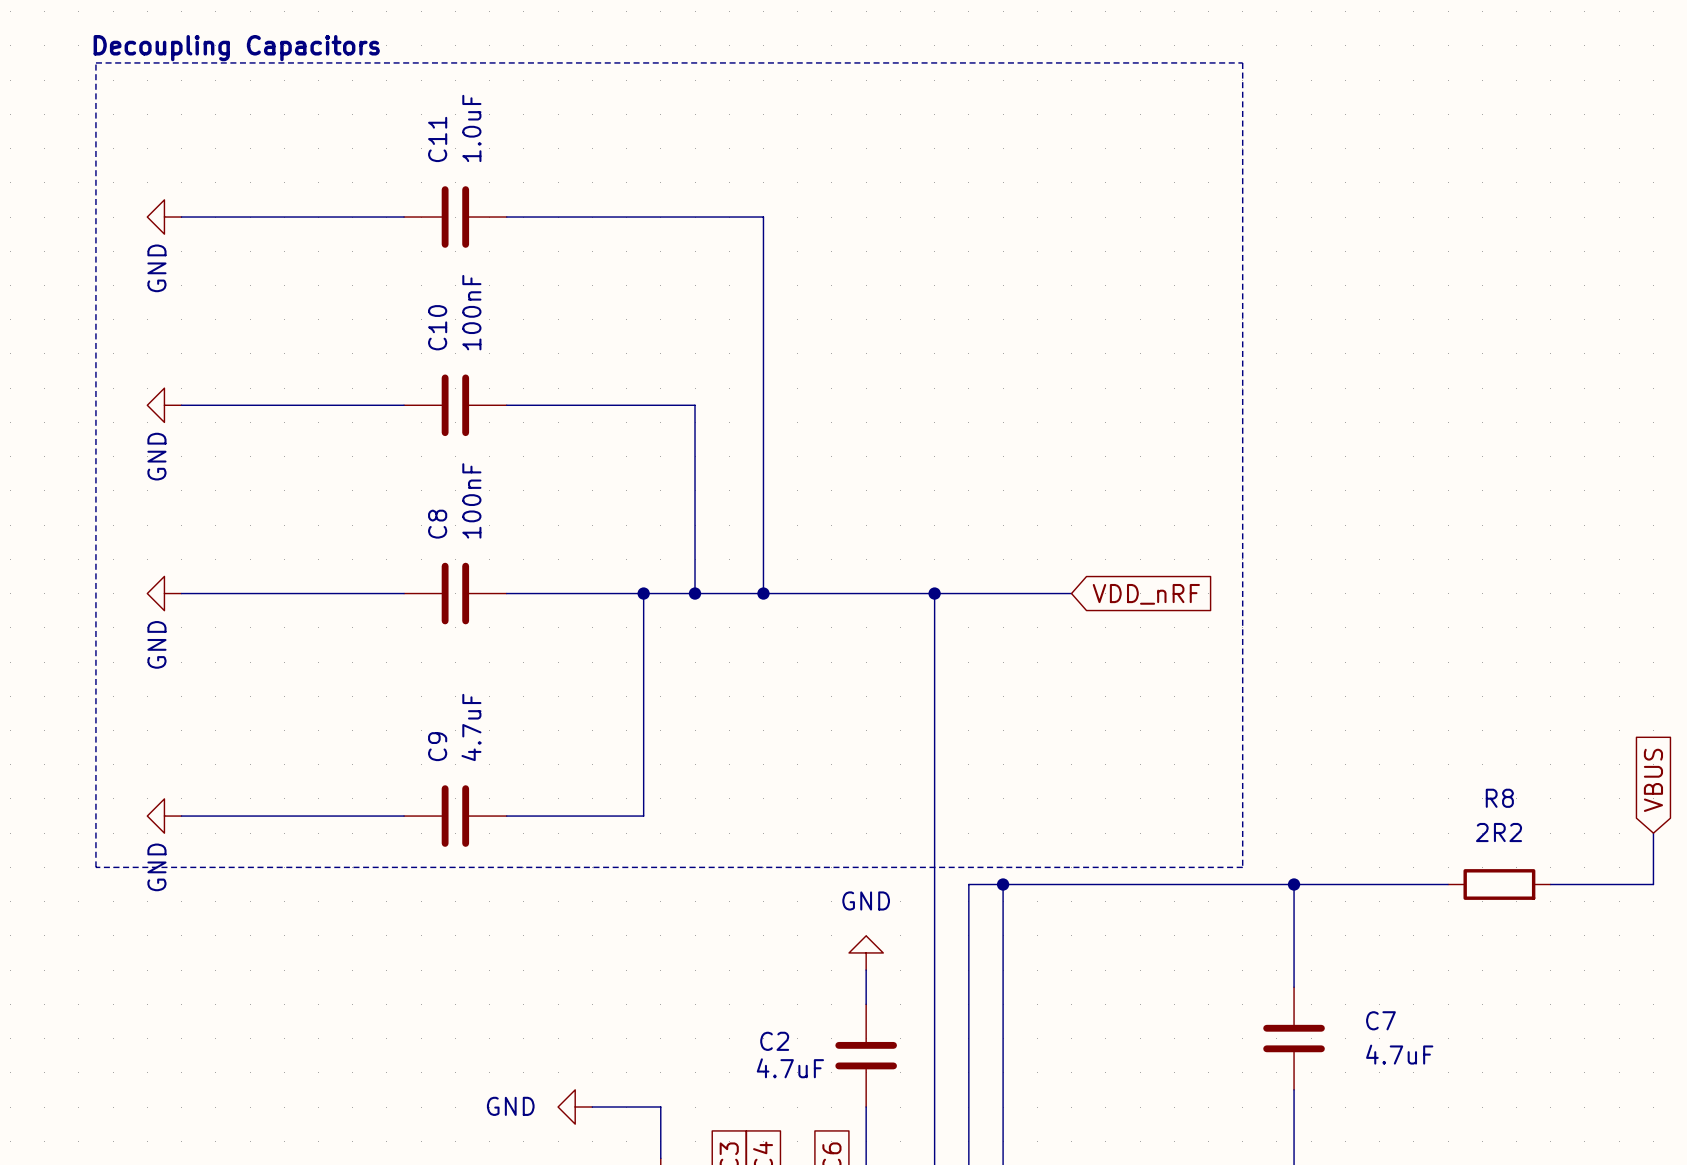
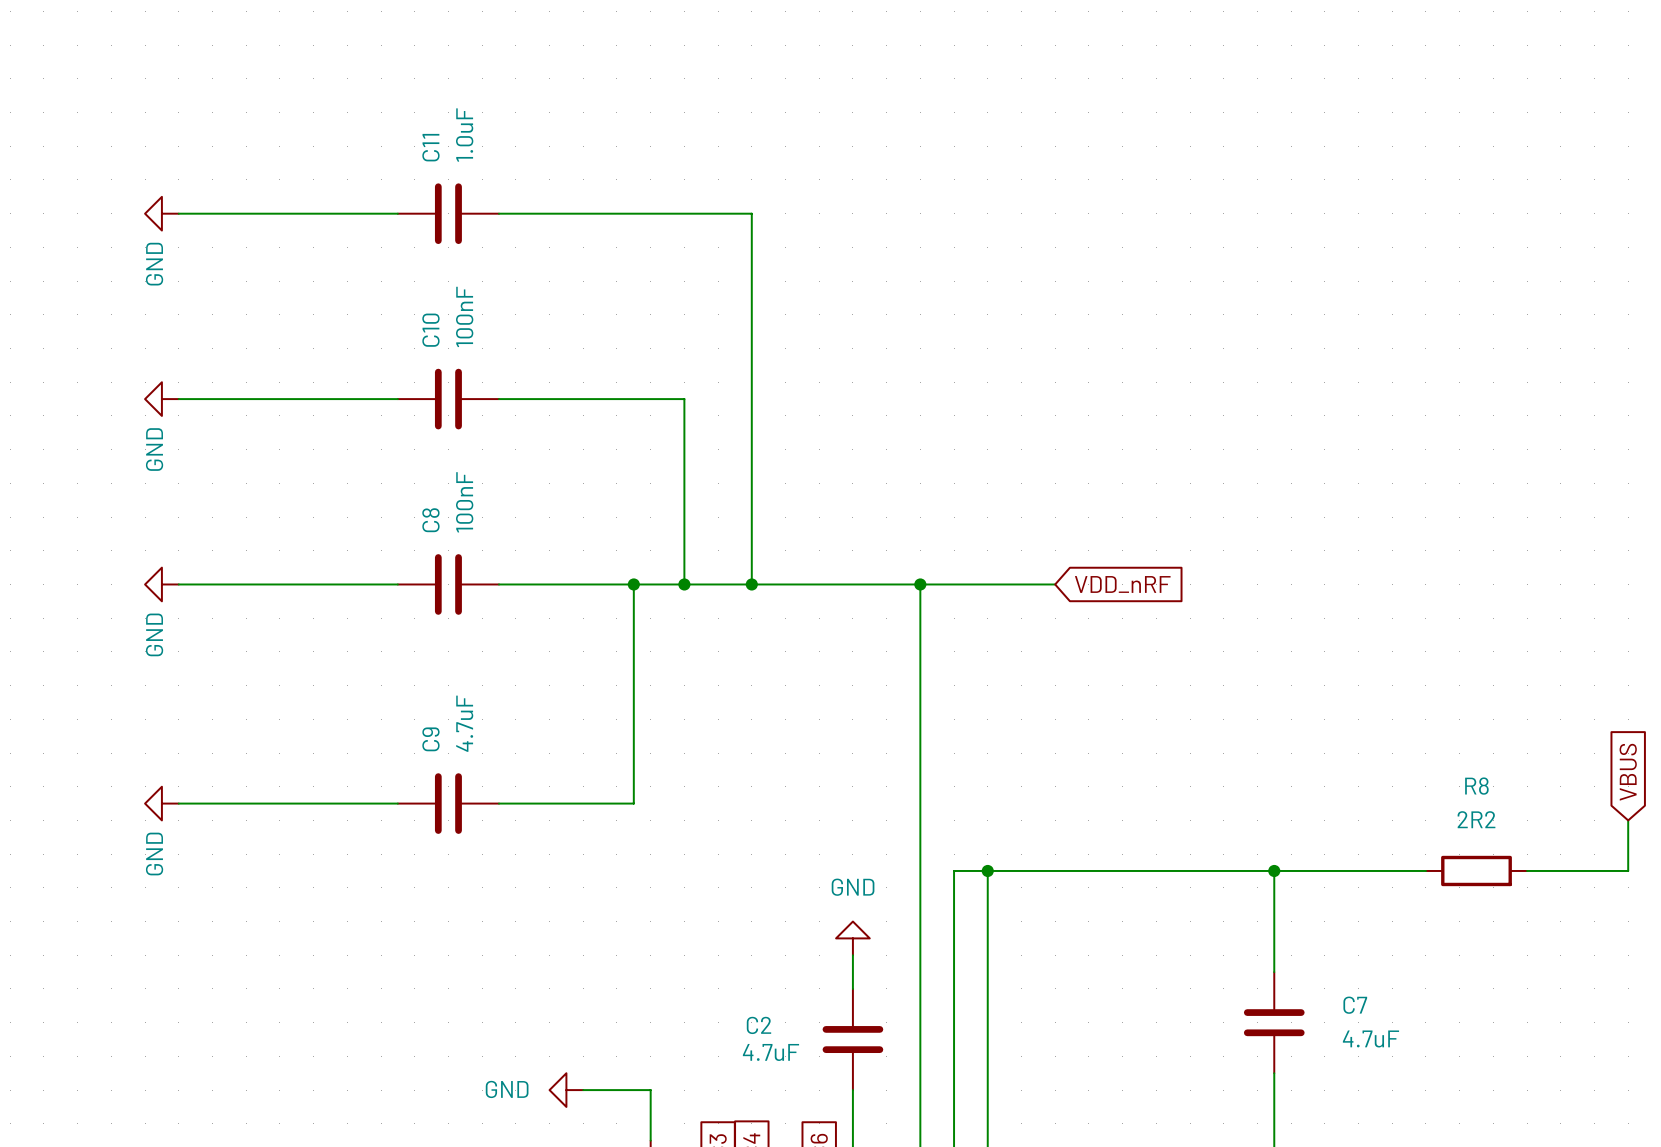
text: Decoupling Capacitors (236, 48) -> none
line: (95, 62) (1242, 62) (1242, 867) (95, 867) (95, 62) -> none

